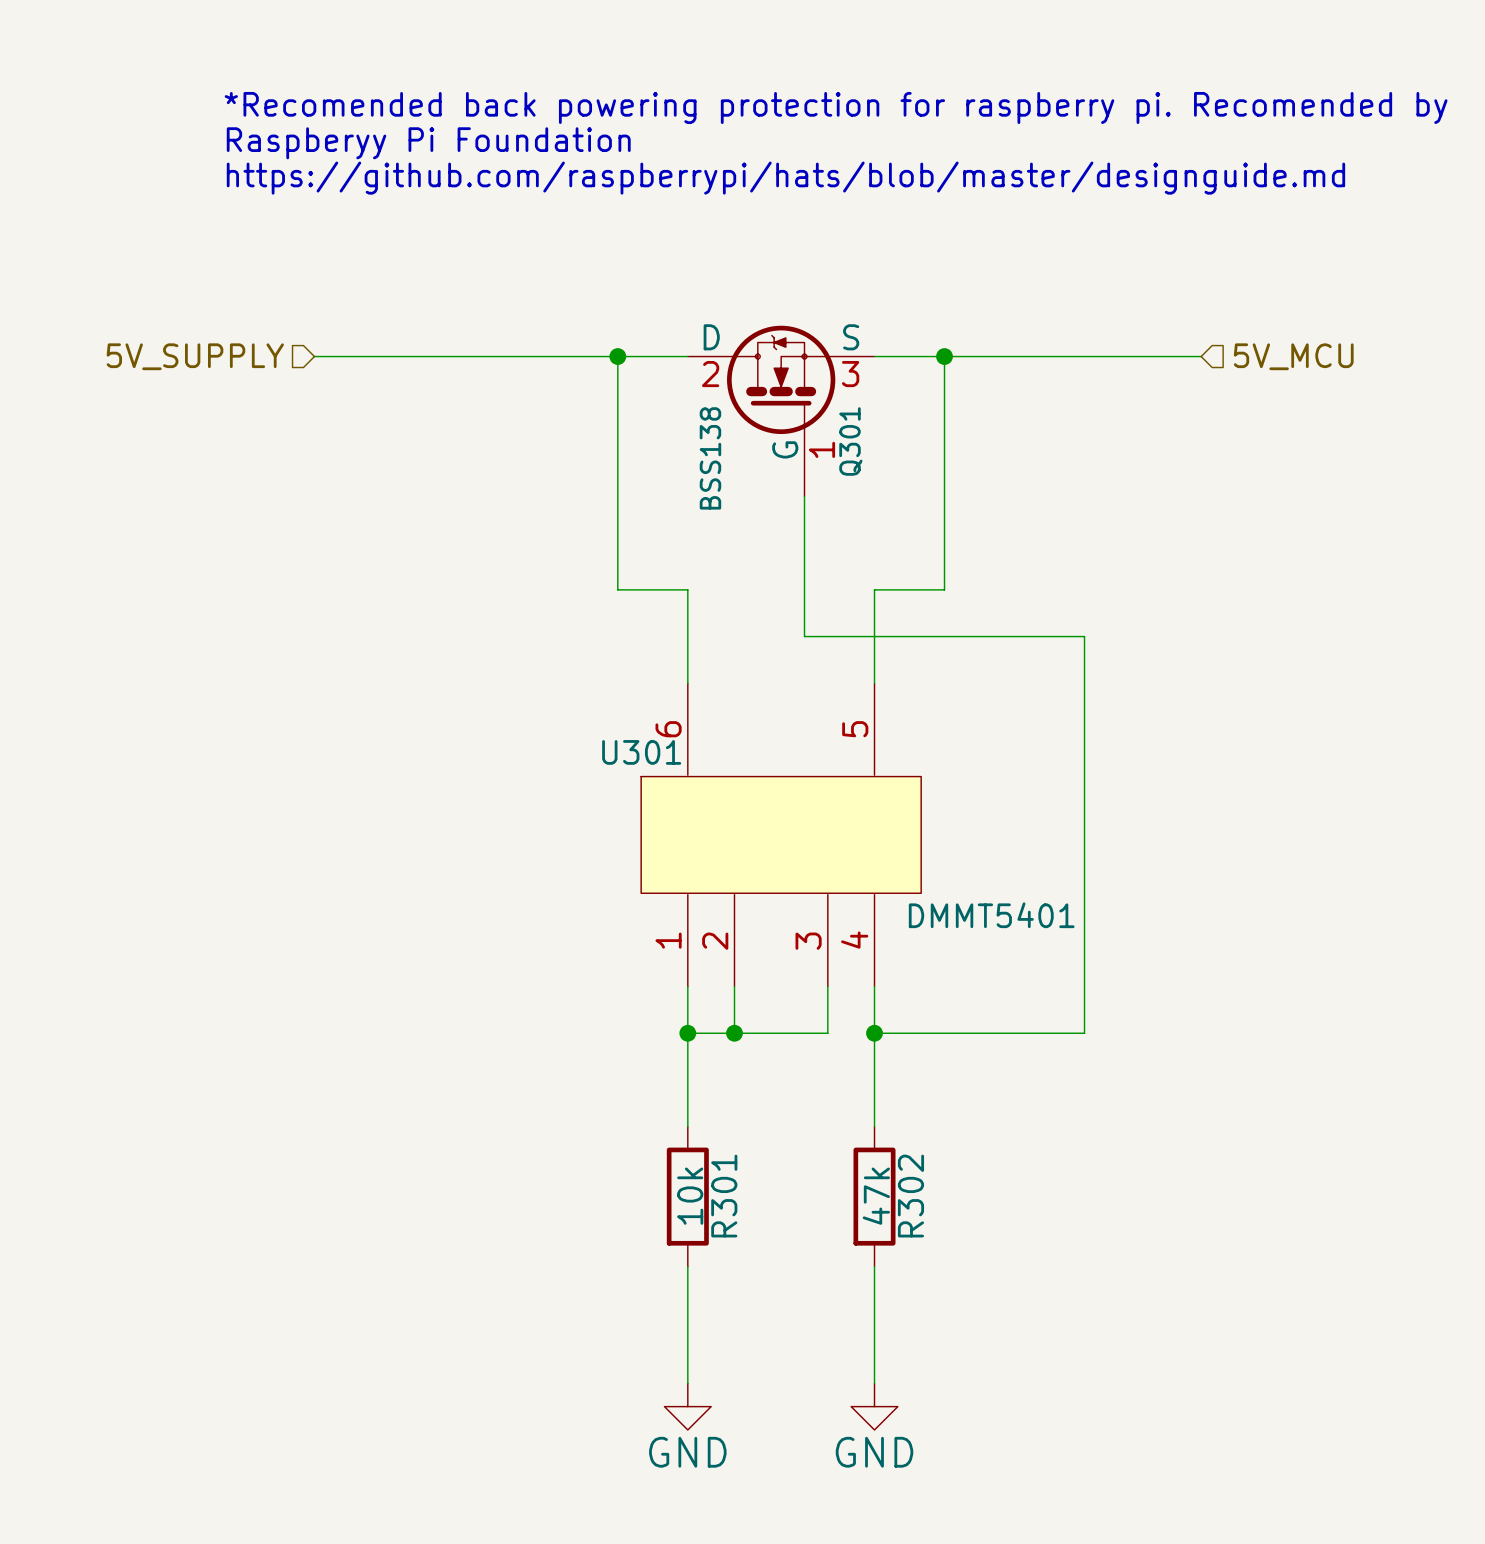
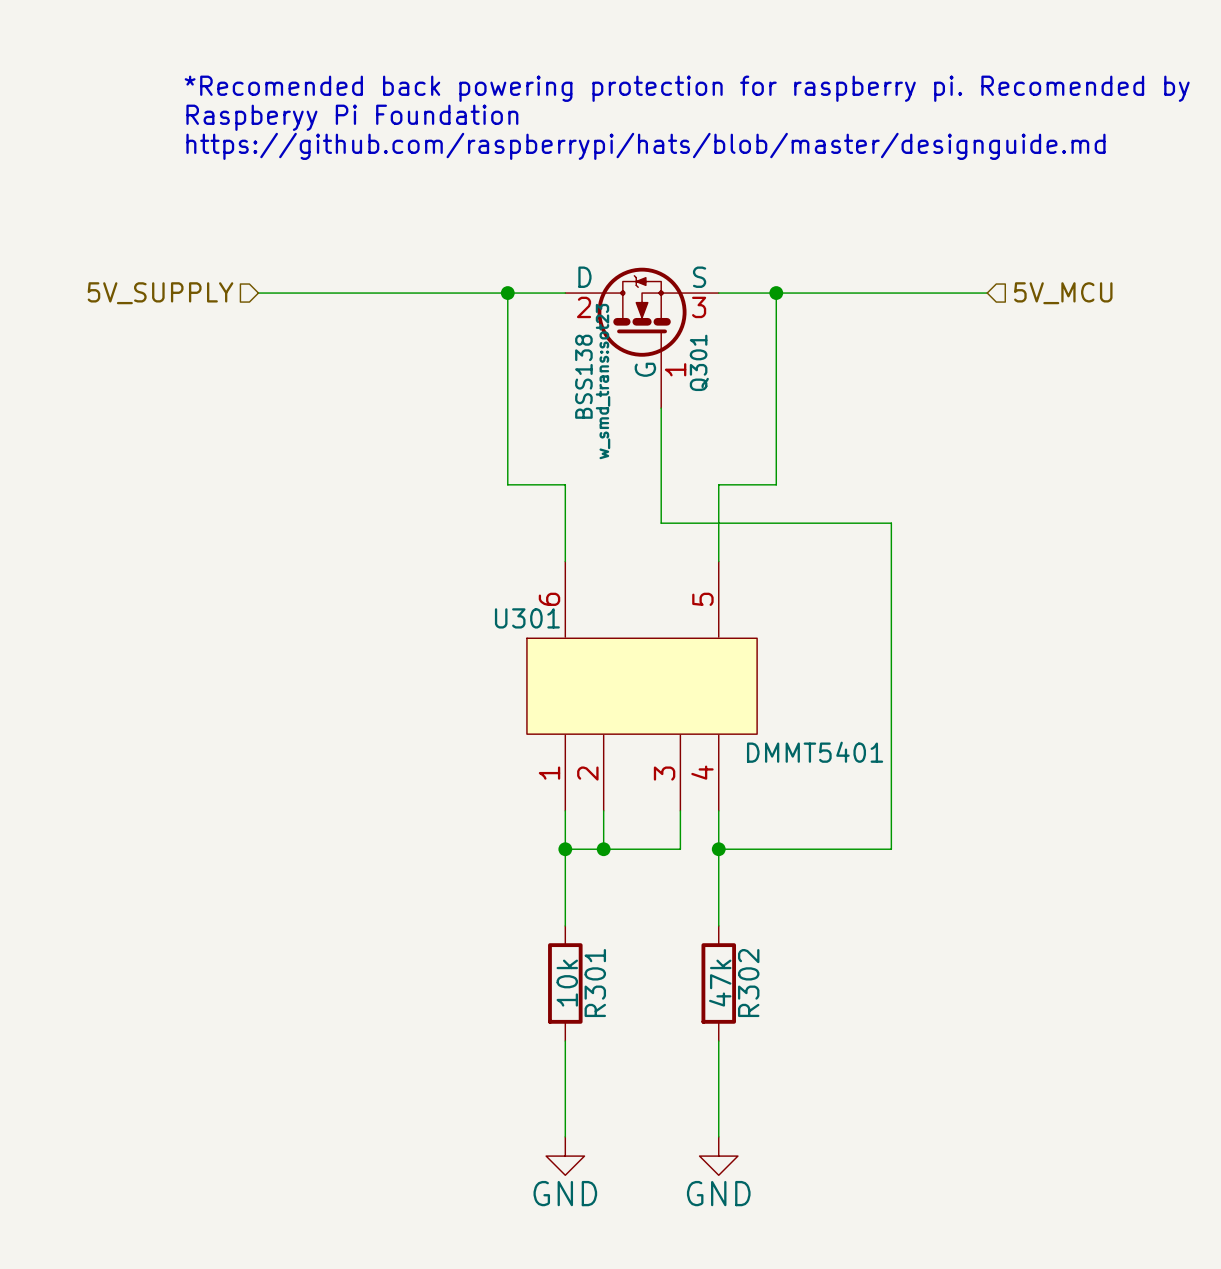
Q301 text: none -> w_smd_trans:sot23 (603, 381)

